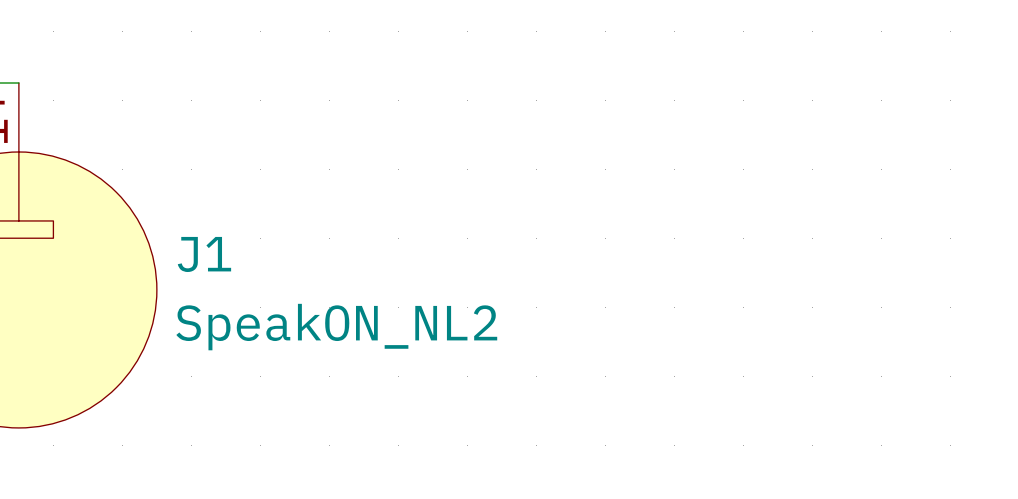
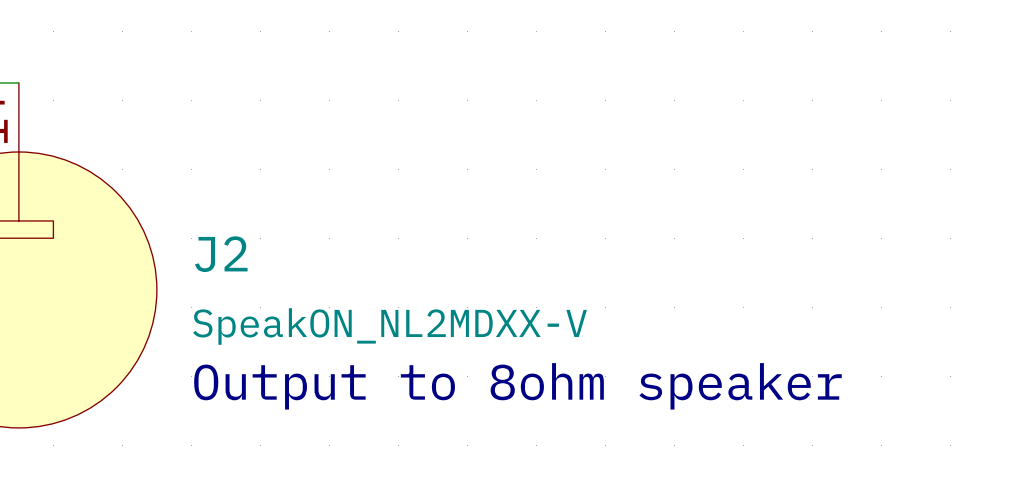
J1 name: J1 (204, 254) -> J2 (221, 254)
J1 value: SpeakON_NL2 (336, 327) -> SpeakON_NL2MDXX-V (390, 326)
text: none -> Output to 8ohm speaker (517, 386)

